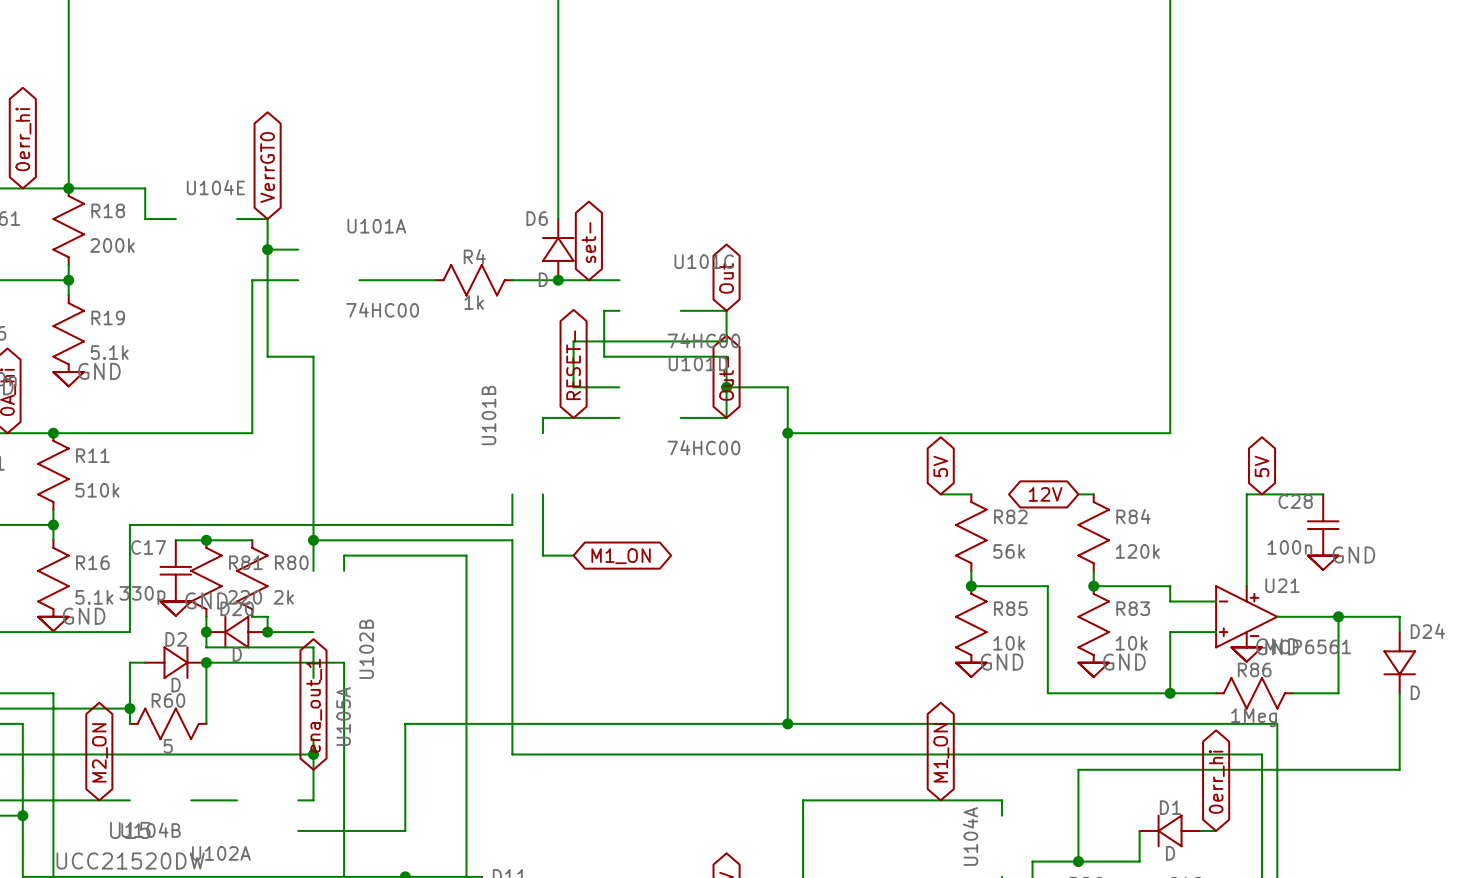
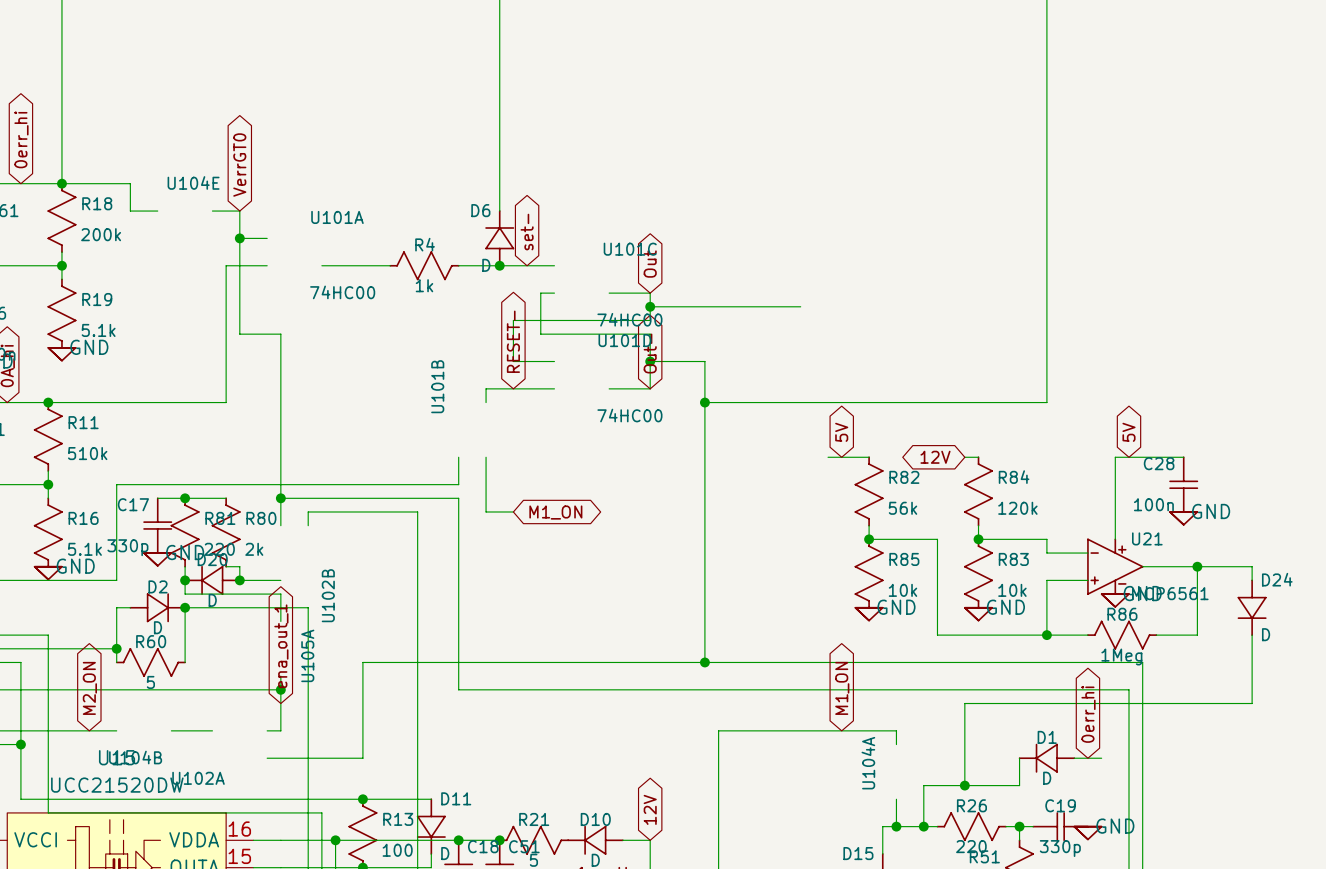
wire: none -> (650, 306) (800, 306)
junction: none -> (650, 306)
wire: none -> (828, 457) (841, 457)
wire: none -> (1087, 758) (1101, 758)

